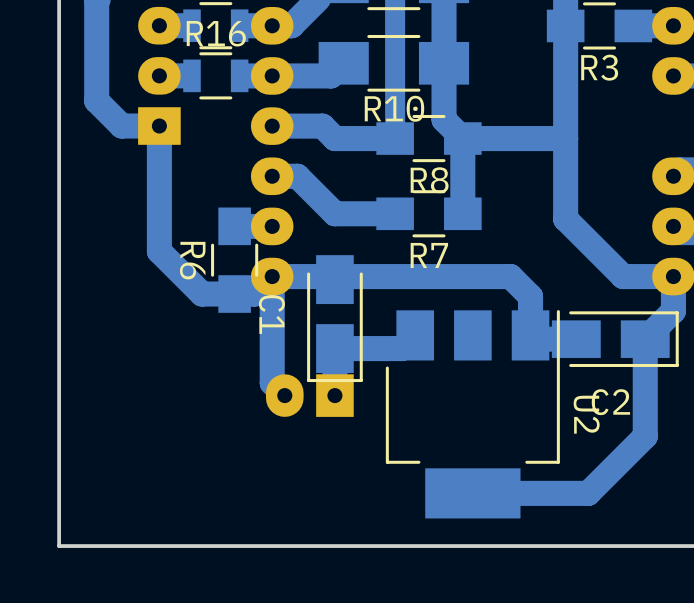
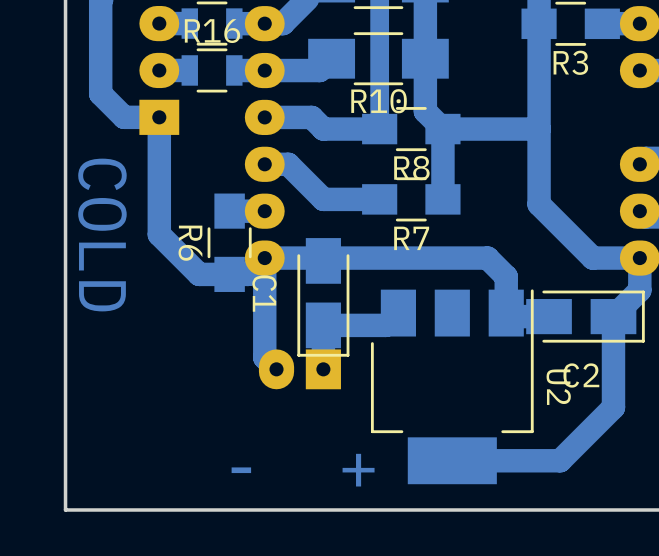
text: none -> COLD (102, 235)
text: none -> - (241, 470)
text: none -> + (358, 470)

